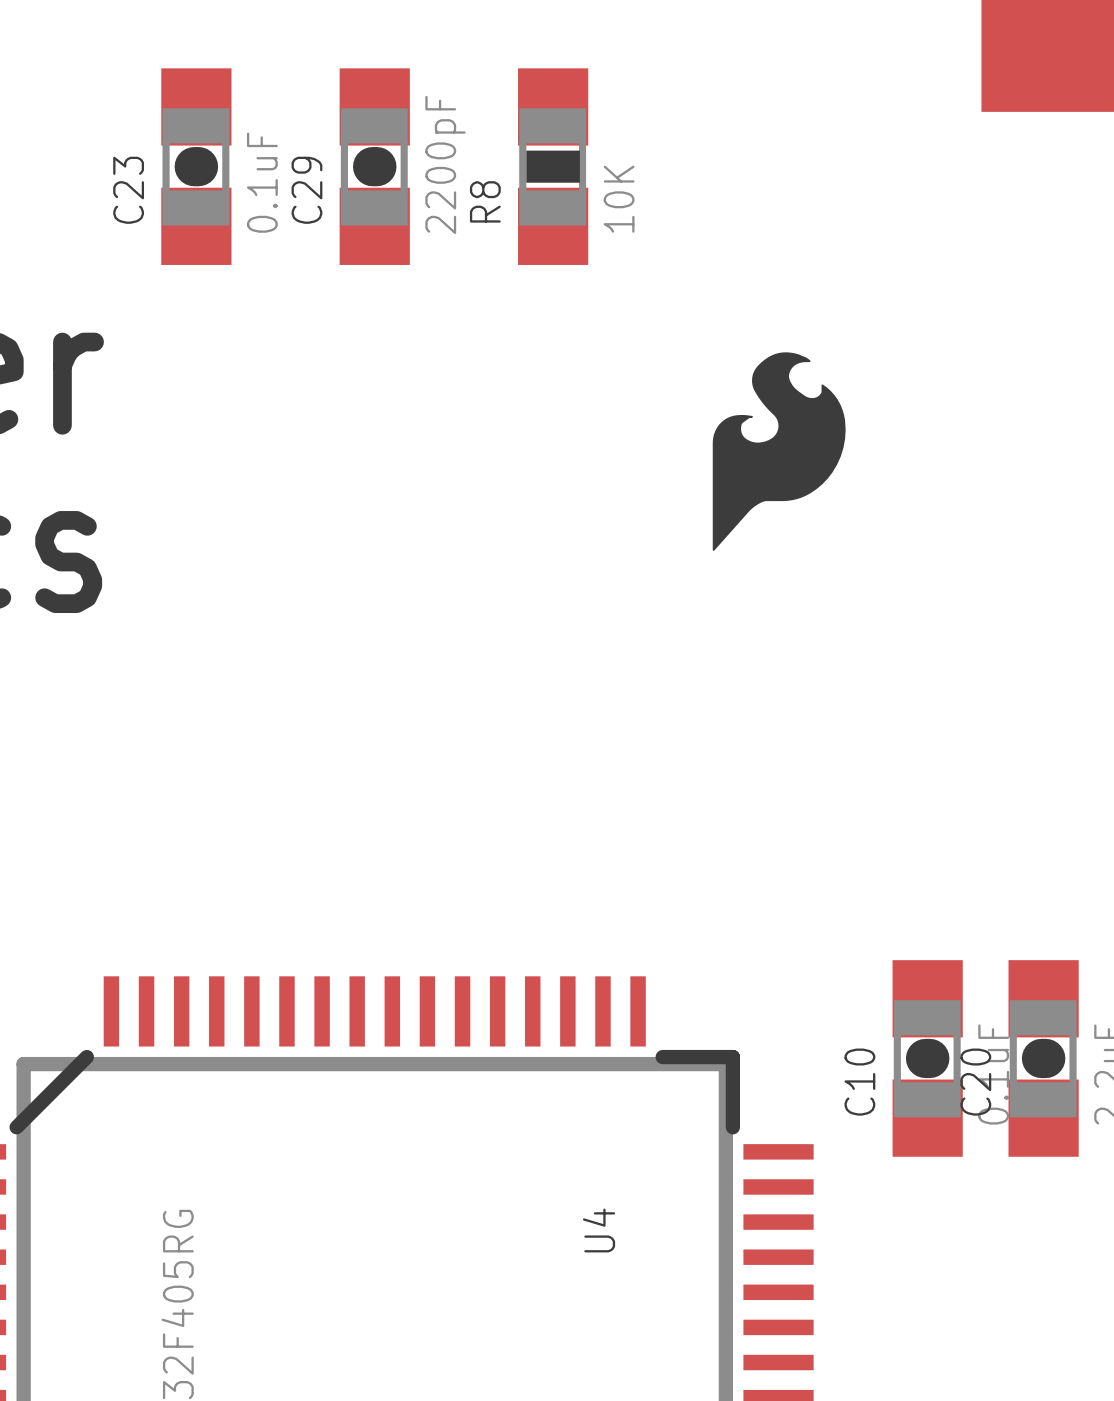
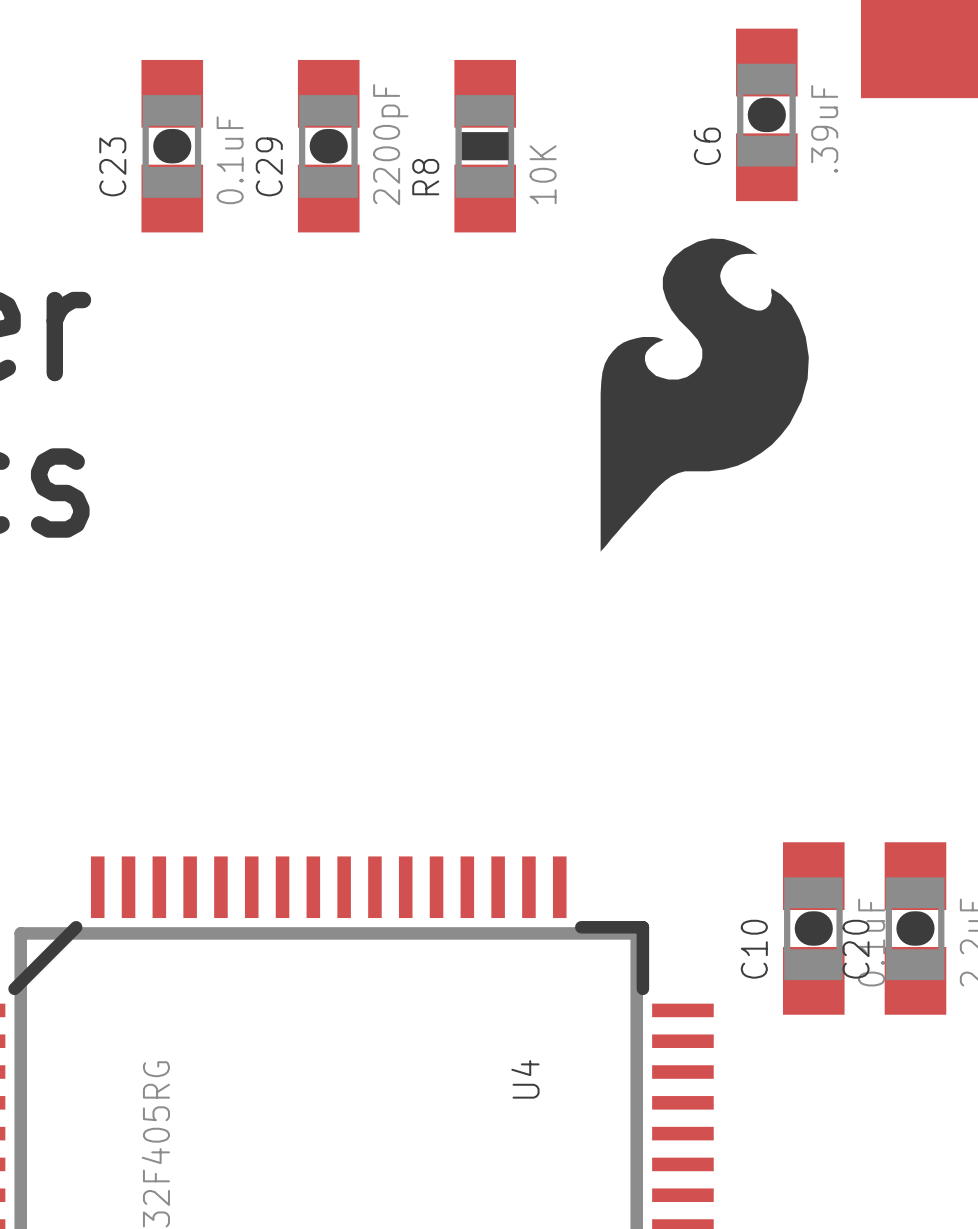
C6: none -> .39uF (766, 114)
drawing shape: [712, 352, 846, 551] -> [600, 238, 809, 553]

